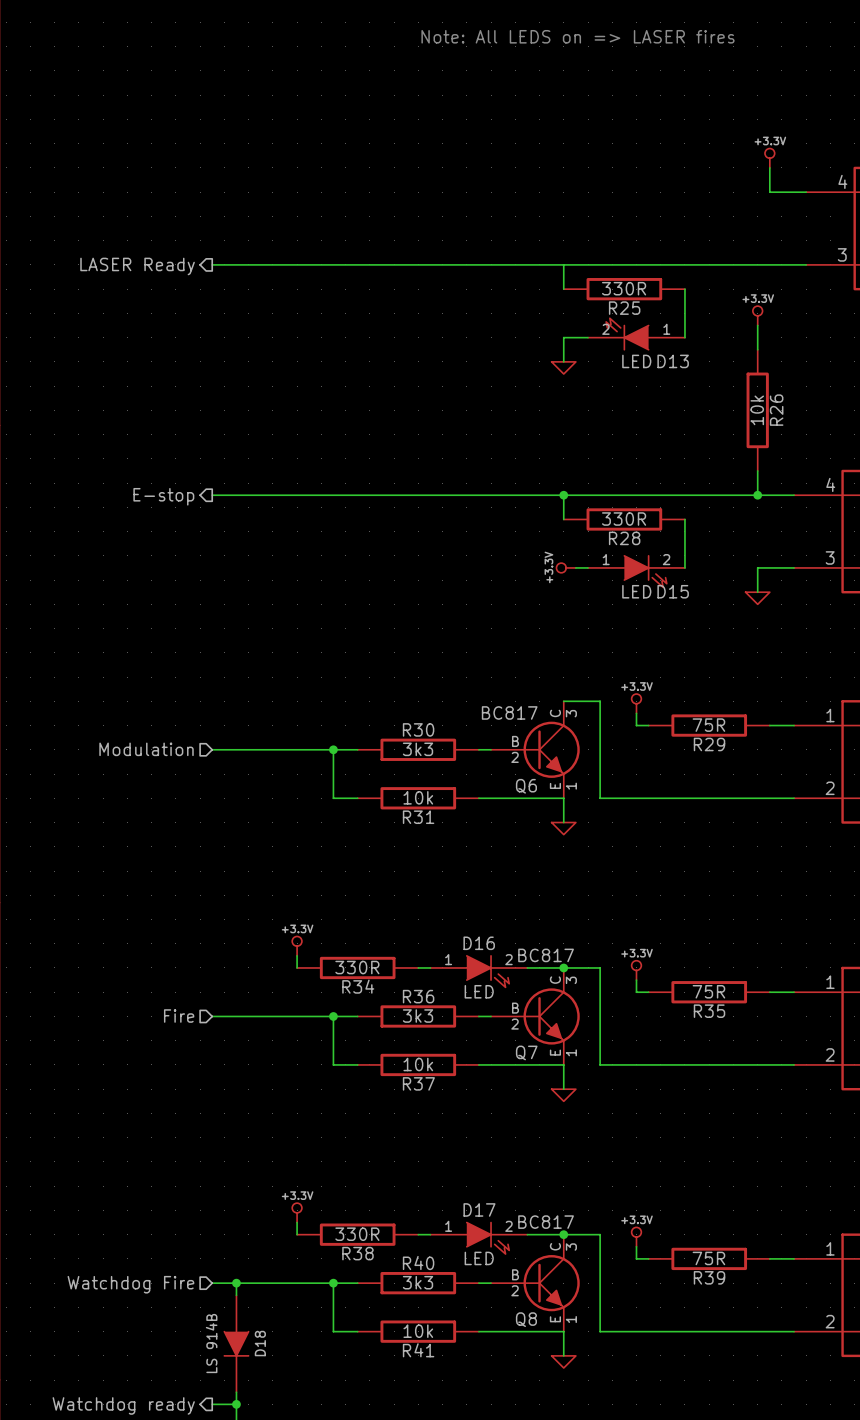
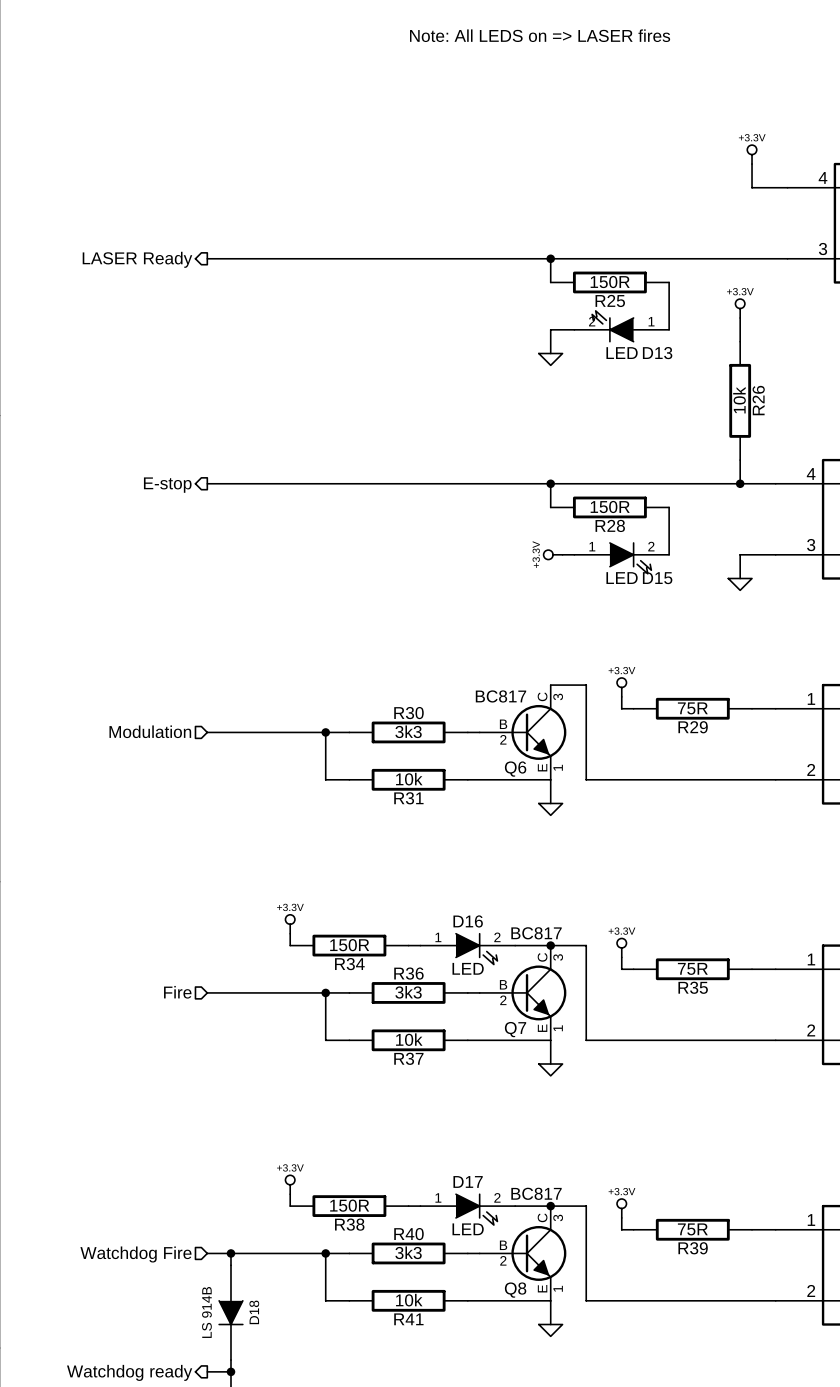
junction: none -> (550, 258)
R25 value: 330R (624, 288) -> 150R (610, 282)
R28 value: 330R (624, 519) -> 150R (610, 507)
R34 value: 330R (357, 967) -> 150R (349, 945)
R38 value: 330R (357, 1234) -> 150R (349, 1205)

